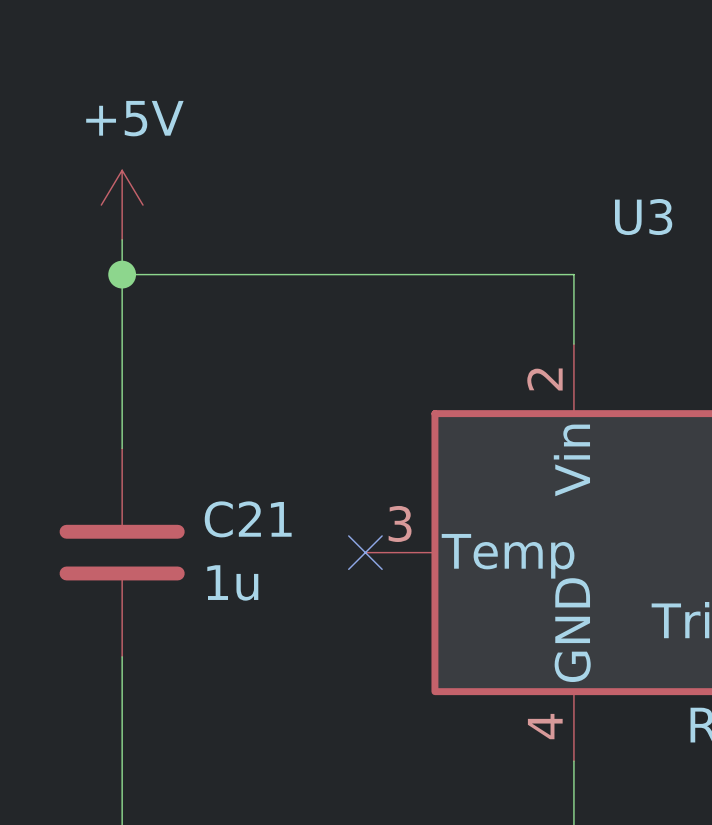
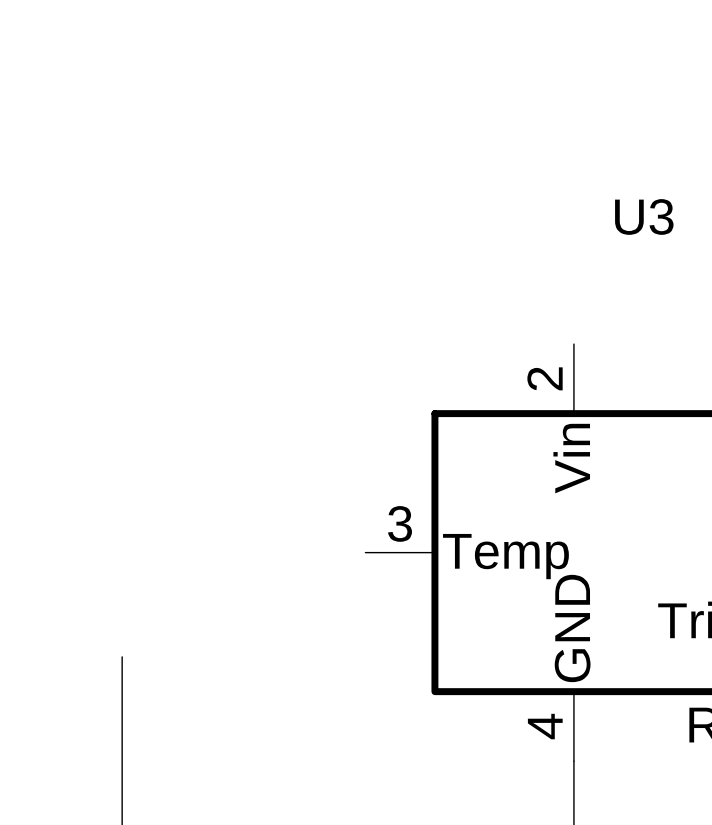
power symbol: +5V (122, 205) -> none
wire: (122, 239) (122, 448) -> none
wire: (122, 274) (573, 274) (573, 344) -> none
junction: (122, 274) -> none
C21: 1u (122, 552) -> none
no-connect mark: (365, 552) -> none

